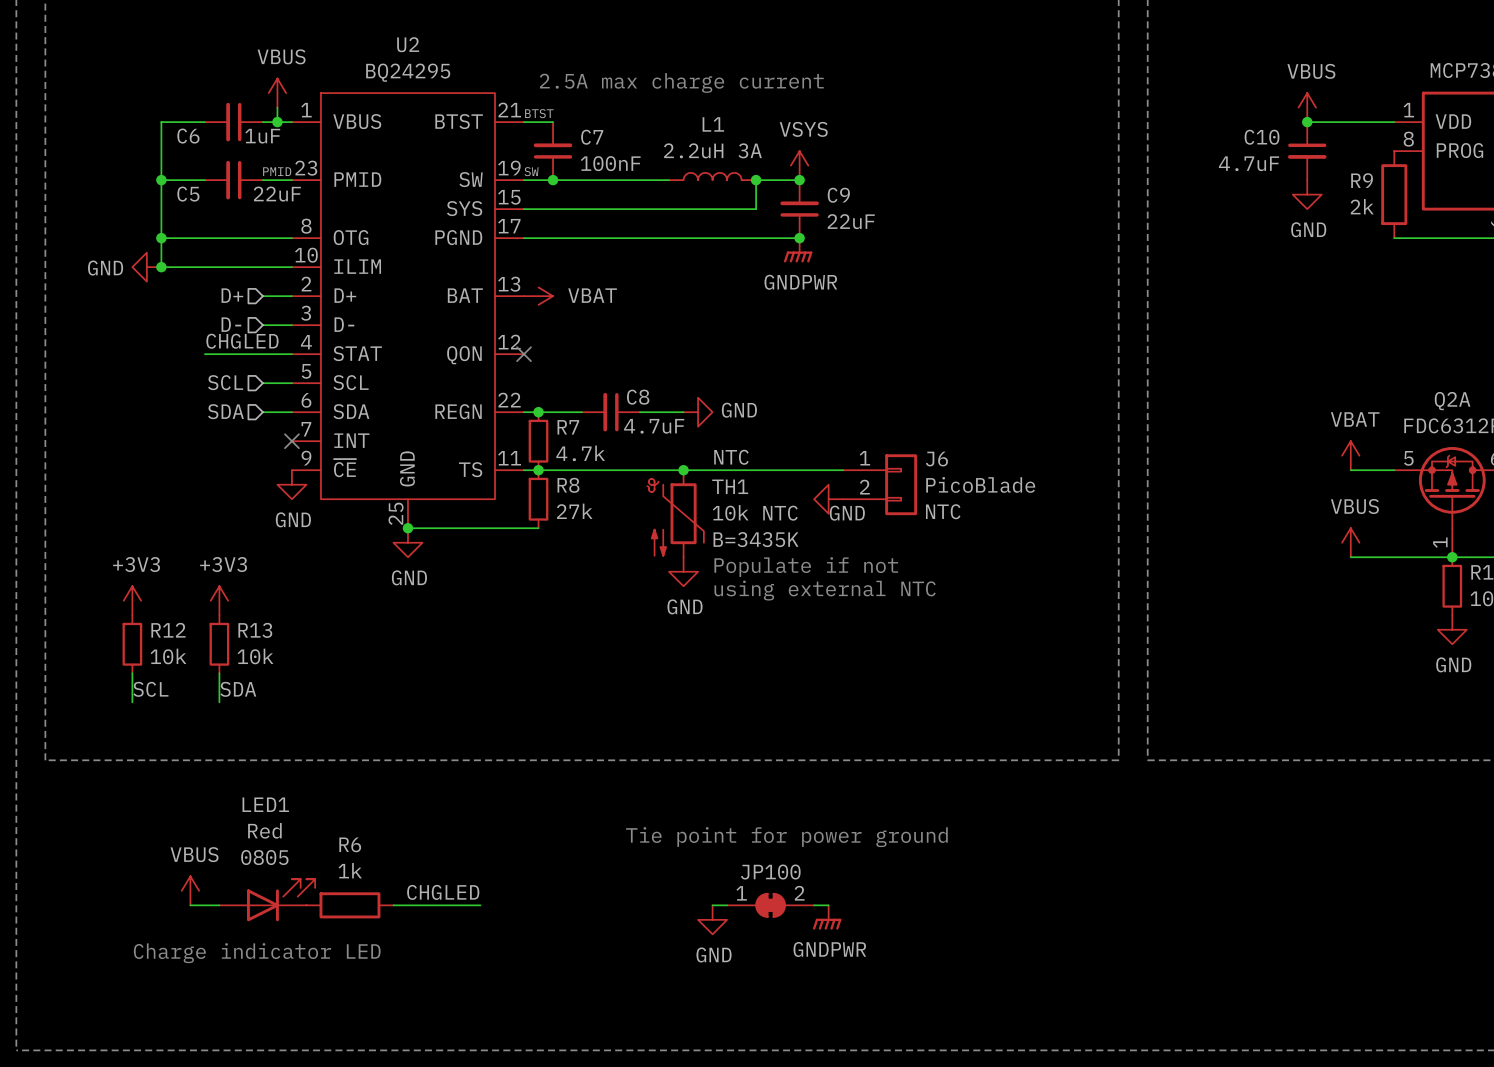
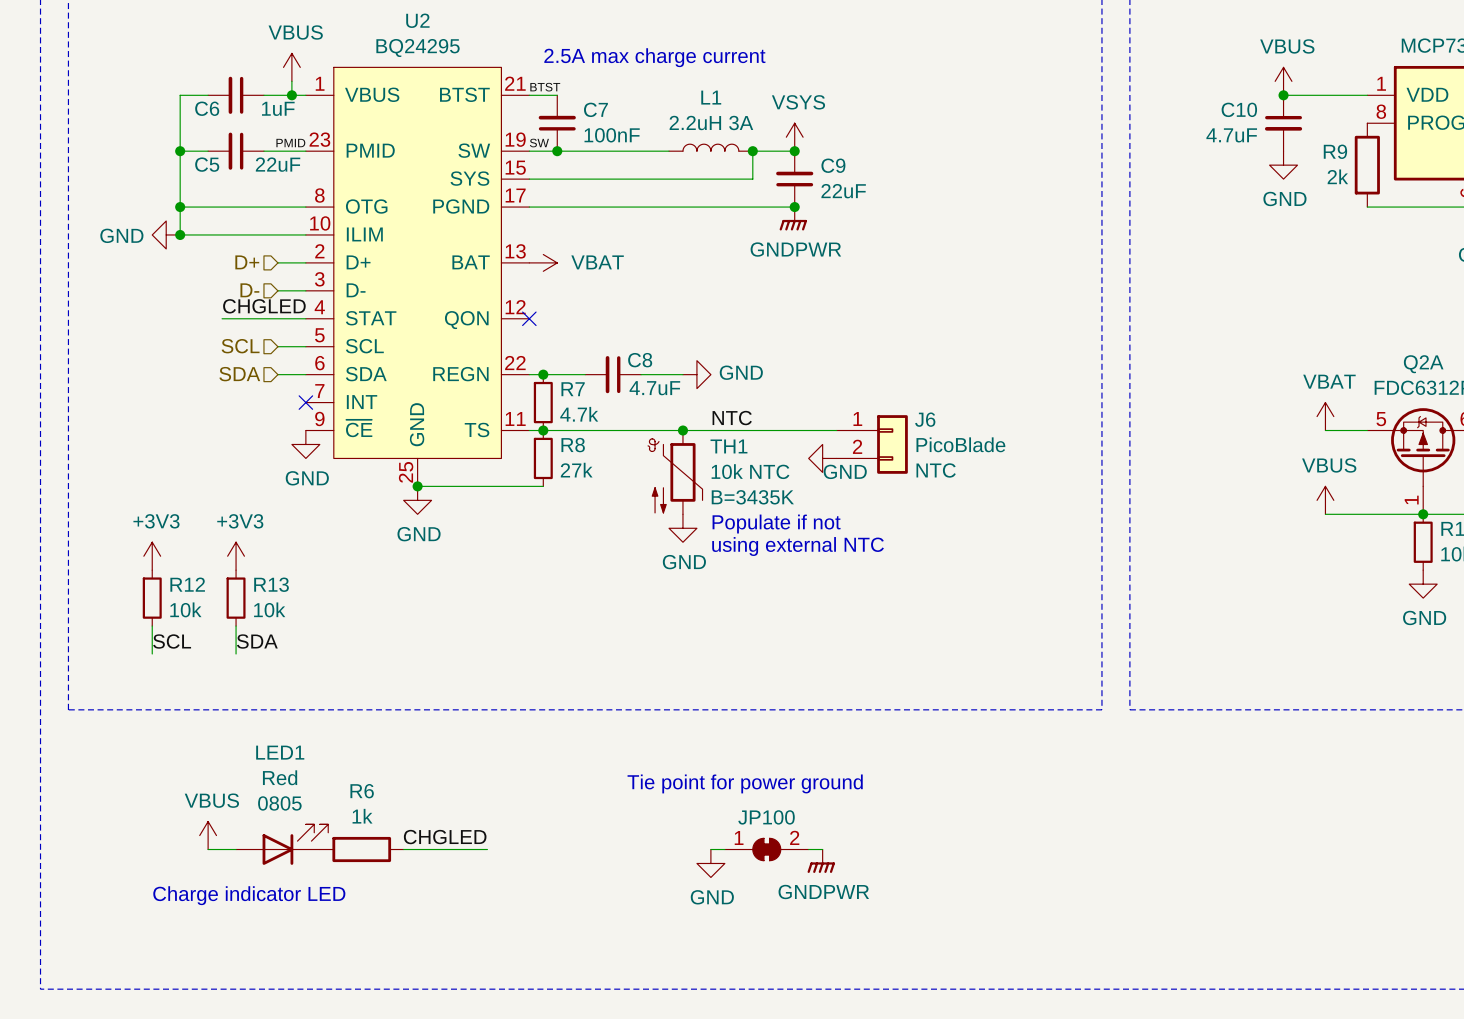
C5 position: (233, 122) -> (236, 95)
C6 position: (233, 180) -> (236, 151)

